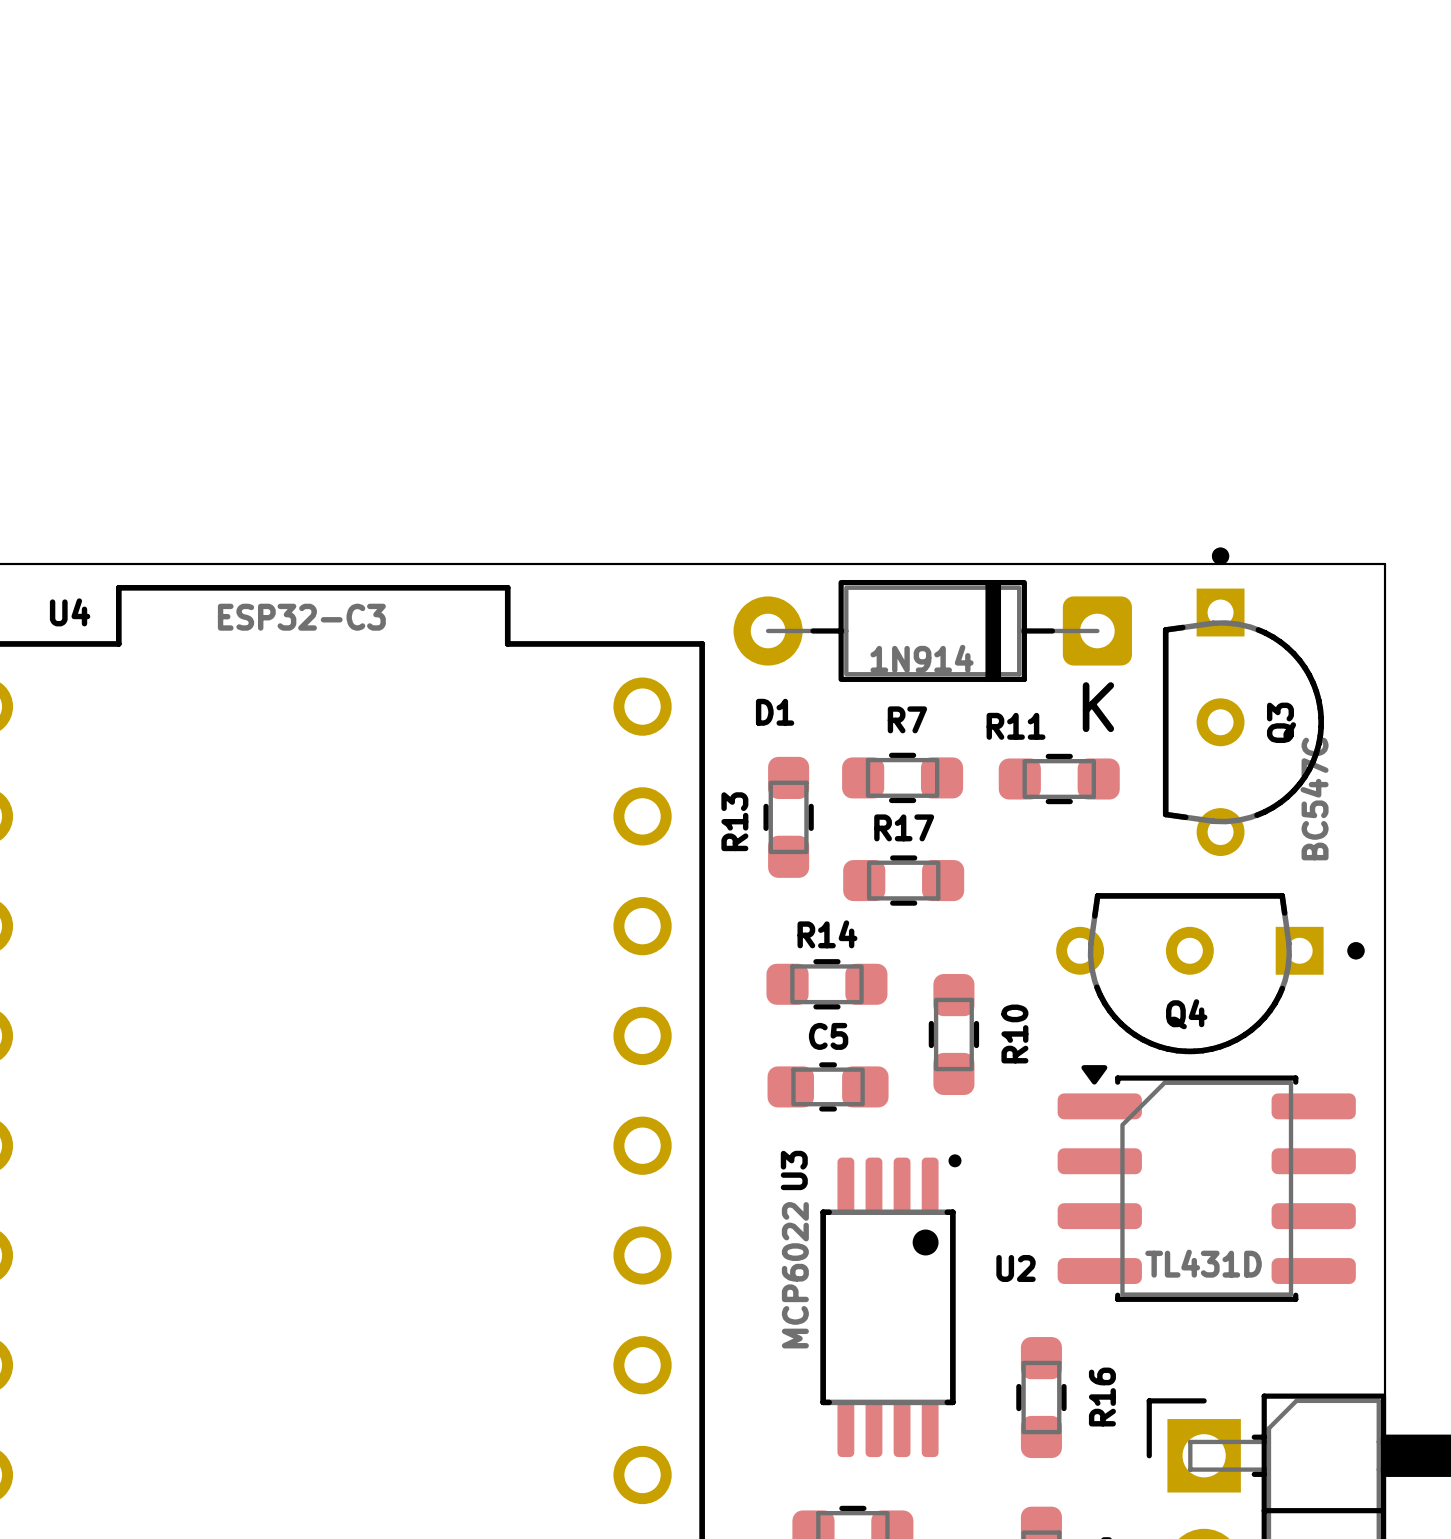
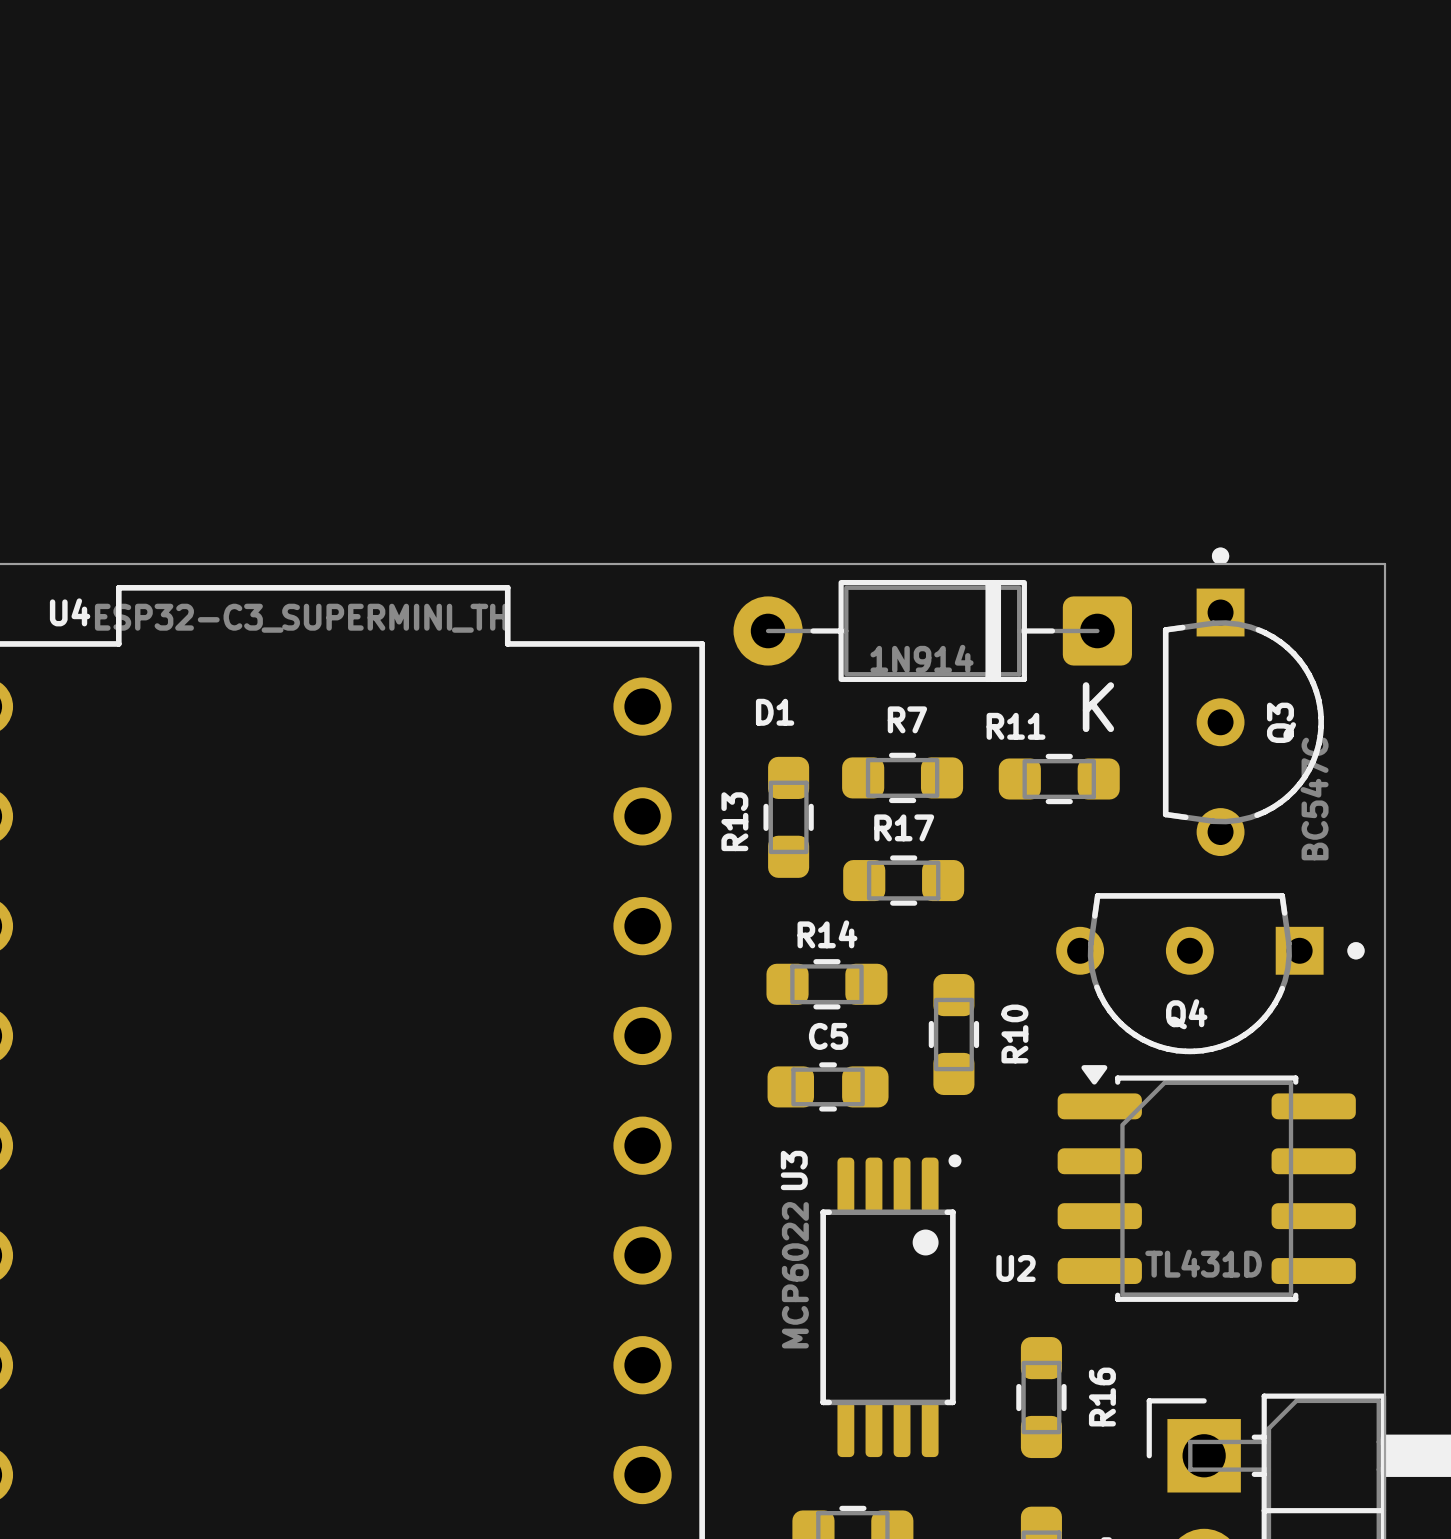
U4 value: ESP32-C3 (301, 617) -> ESP32-C3_SUPERMINI_TH (301, 618)

